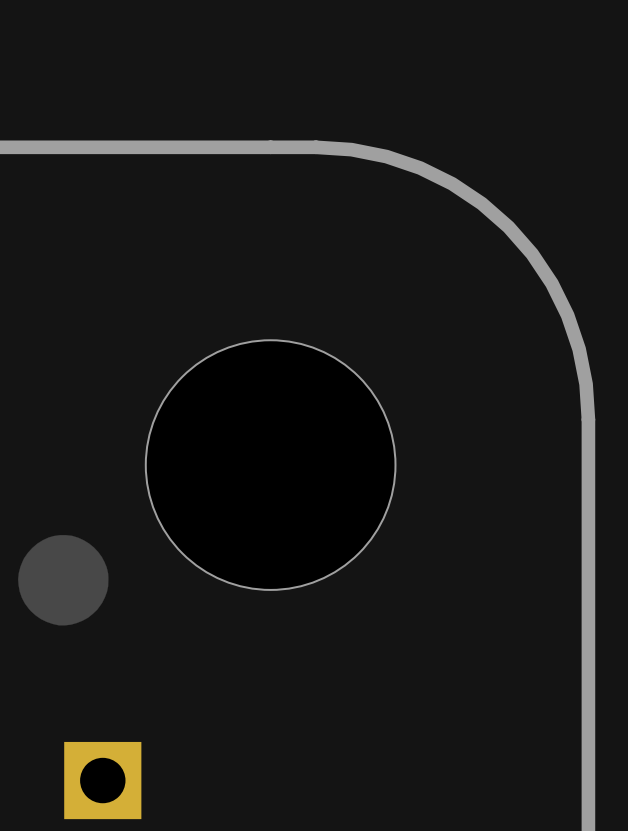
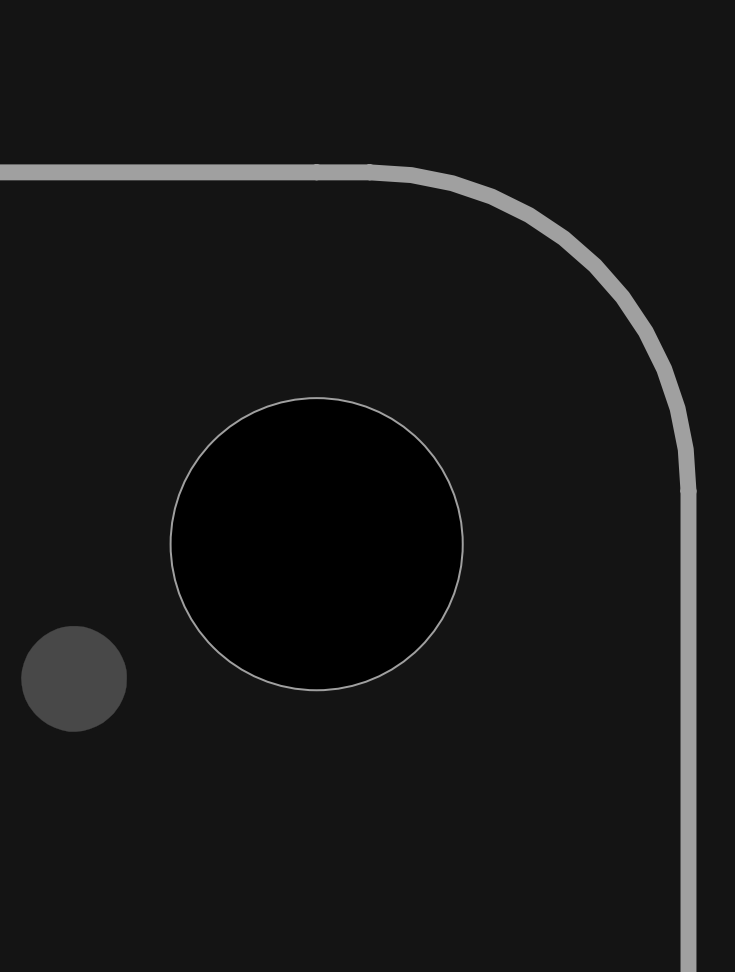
part: (102, 780) -> none

